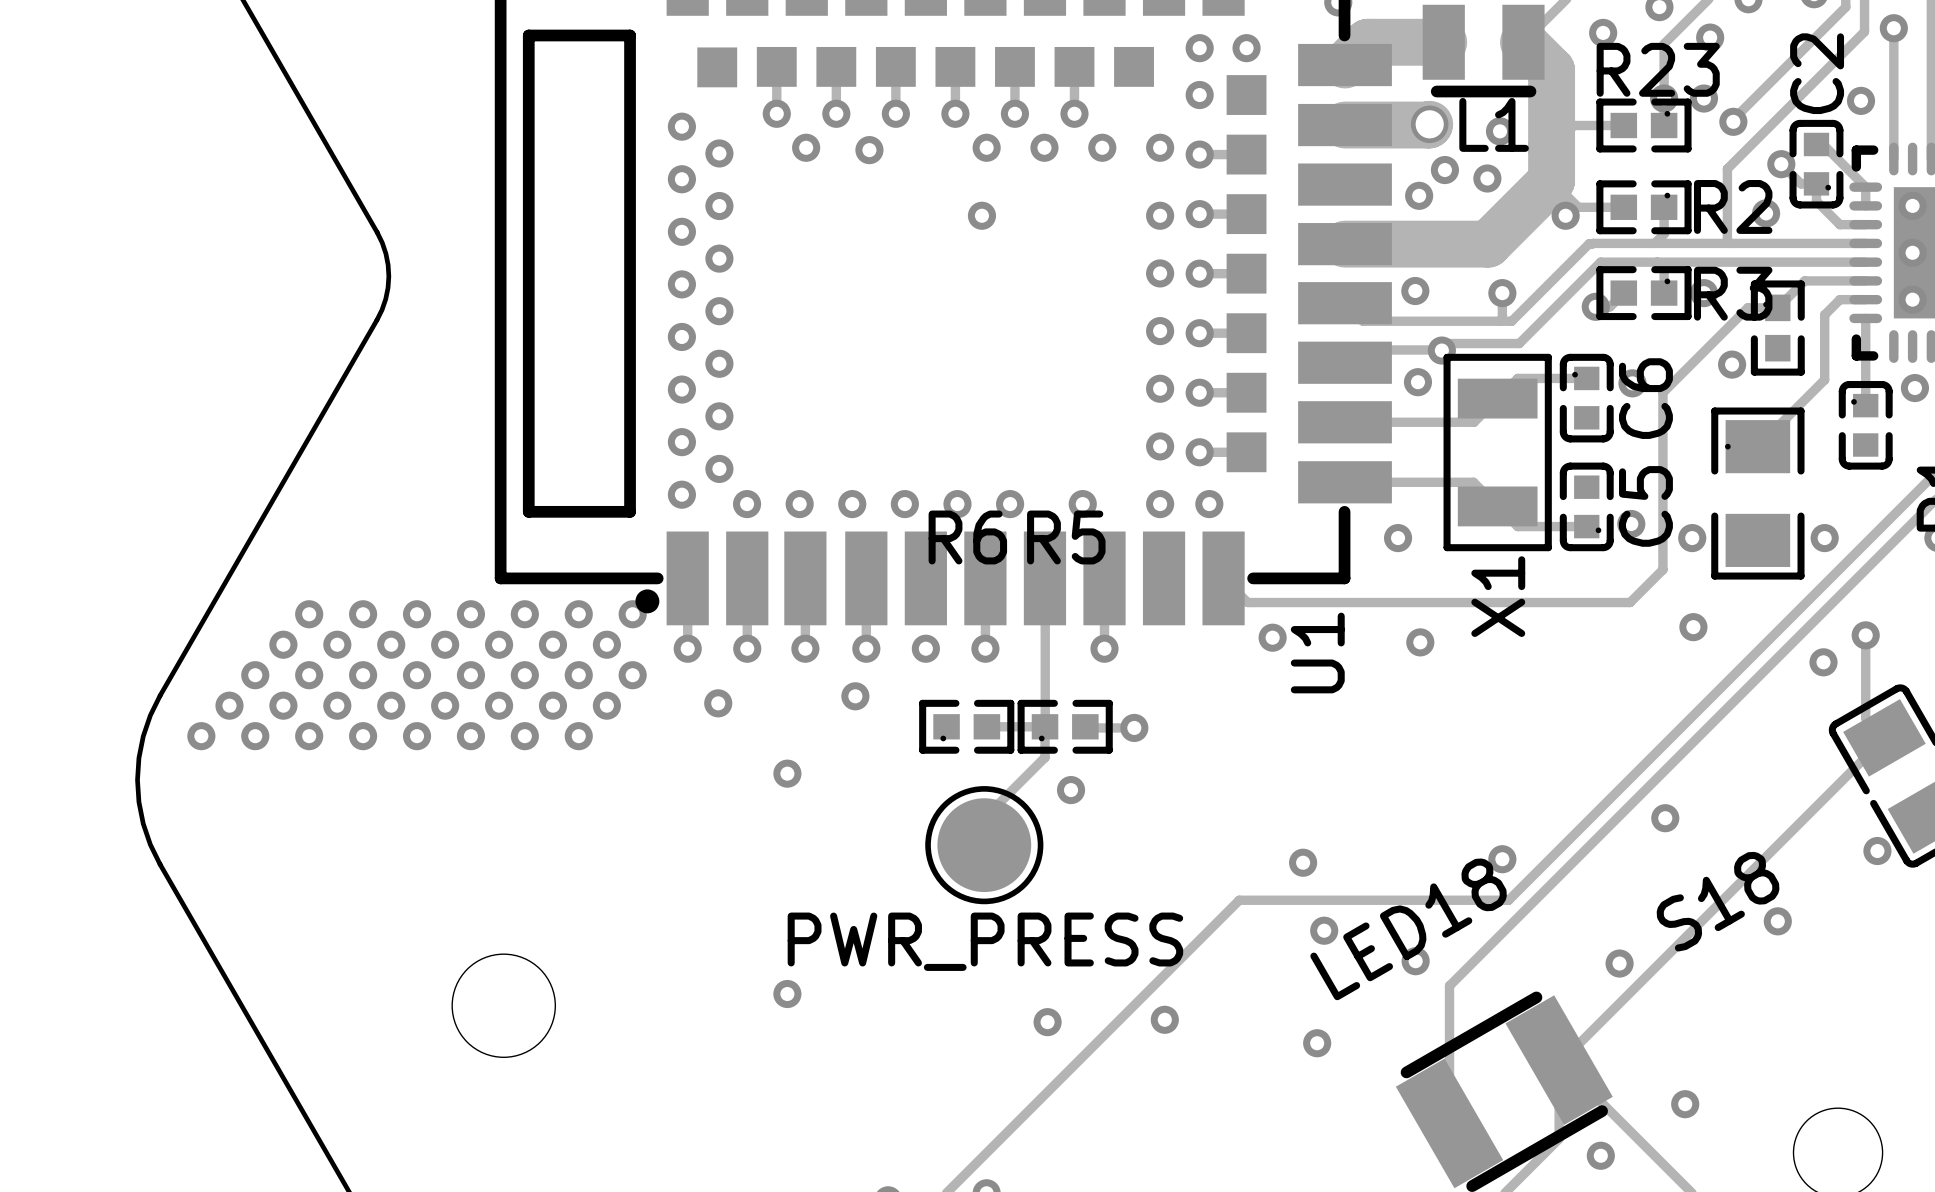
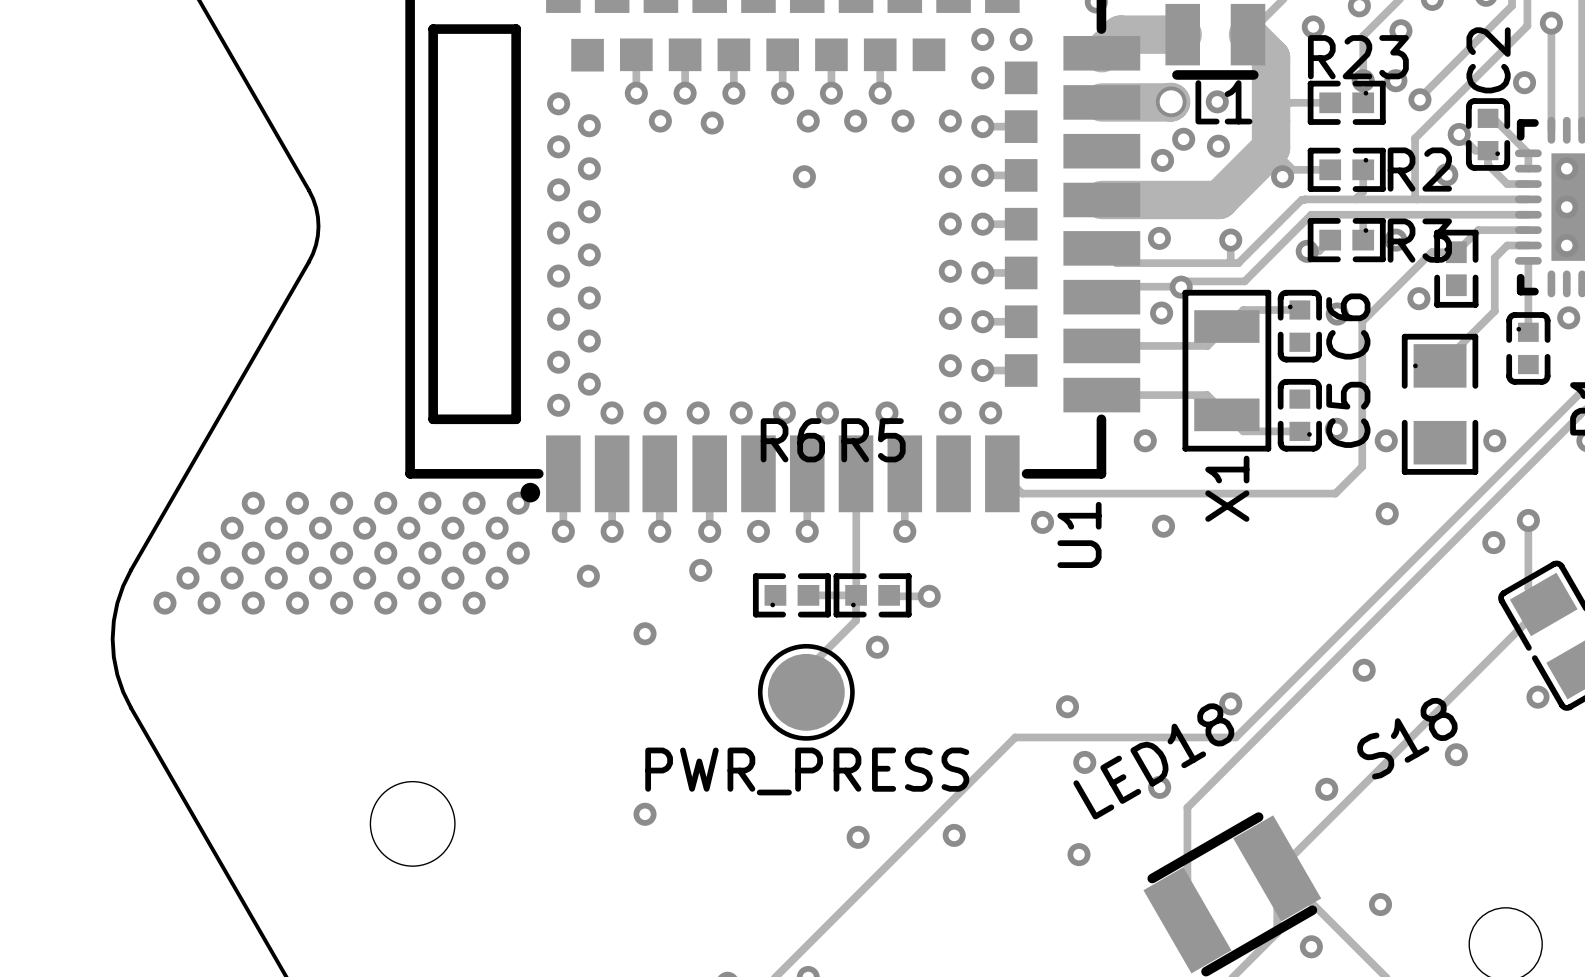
via position: (1500, 131) -> (1217, 101)

